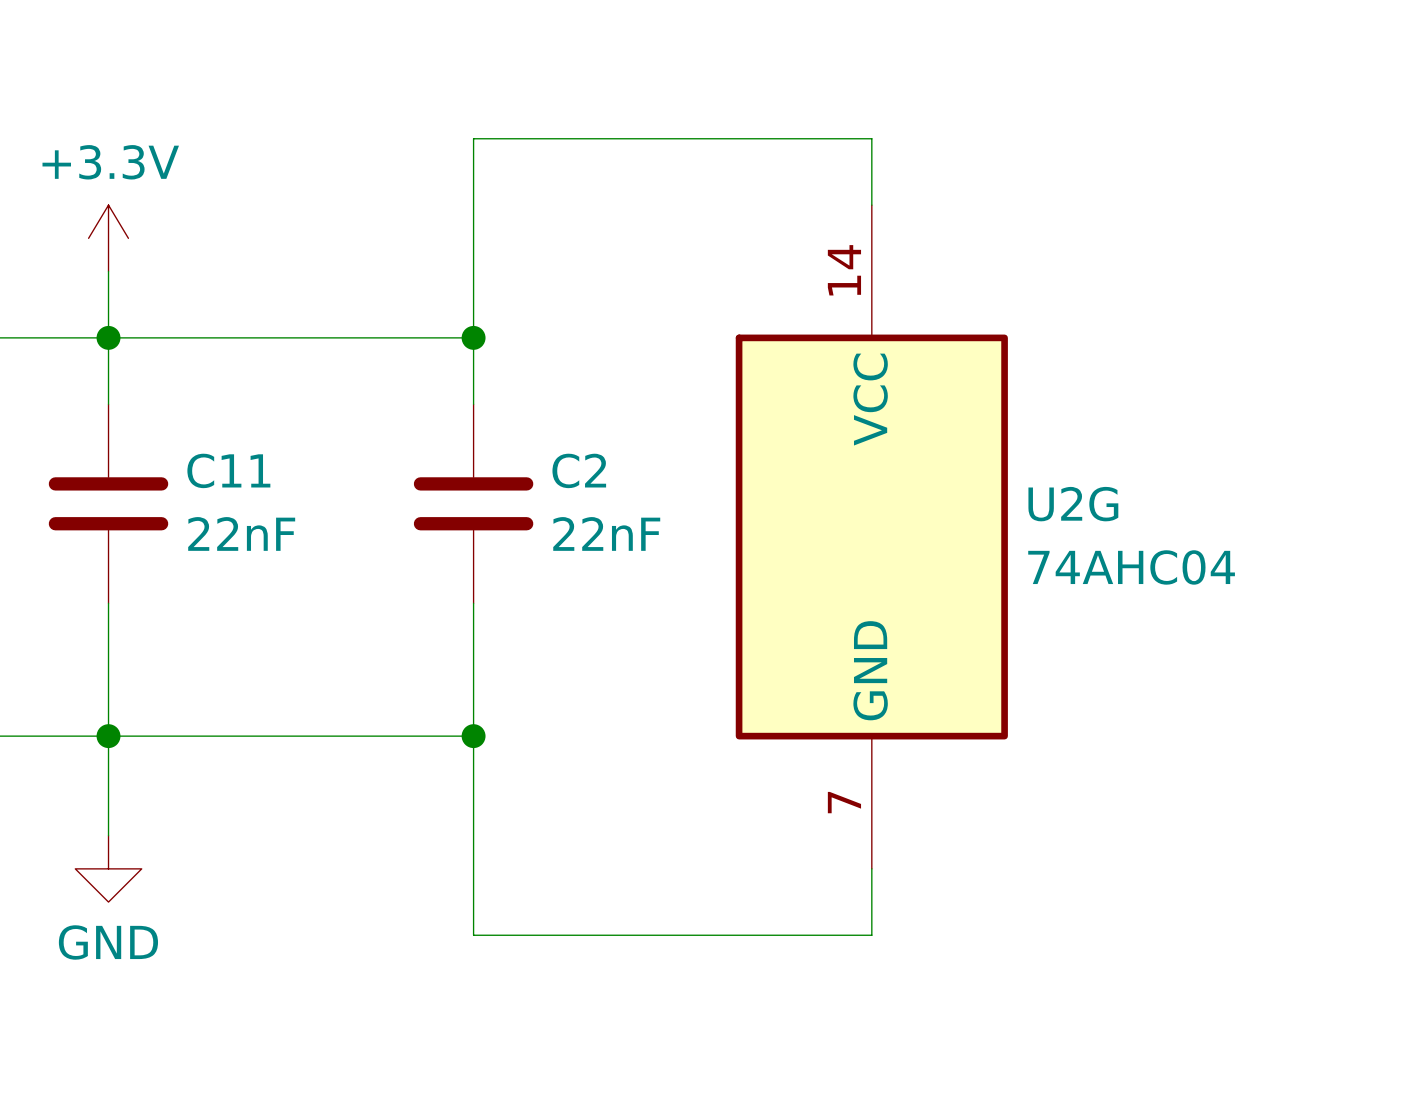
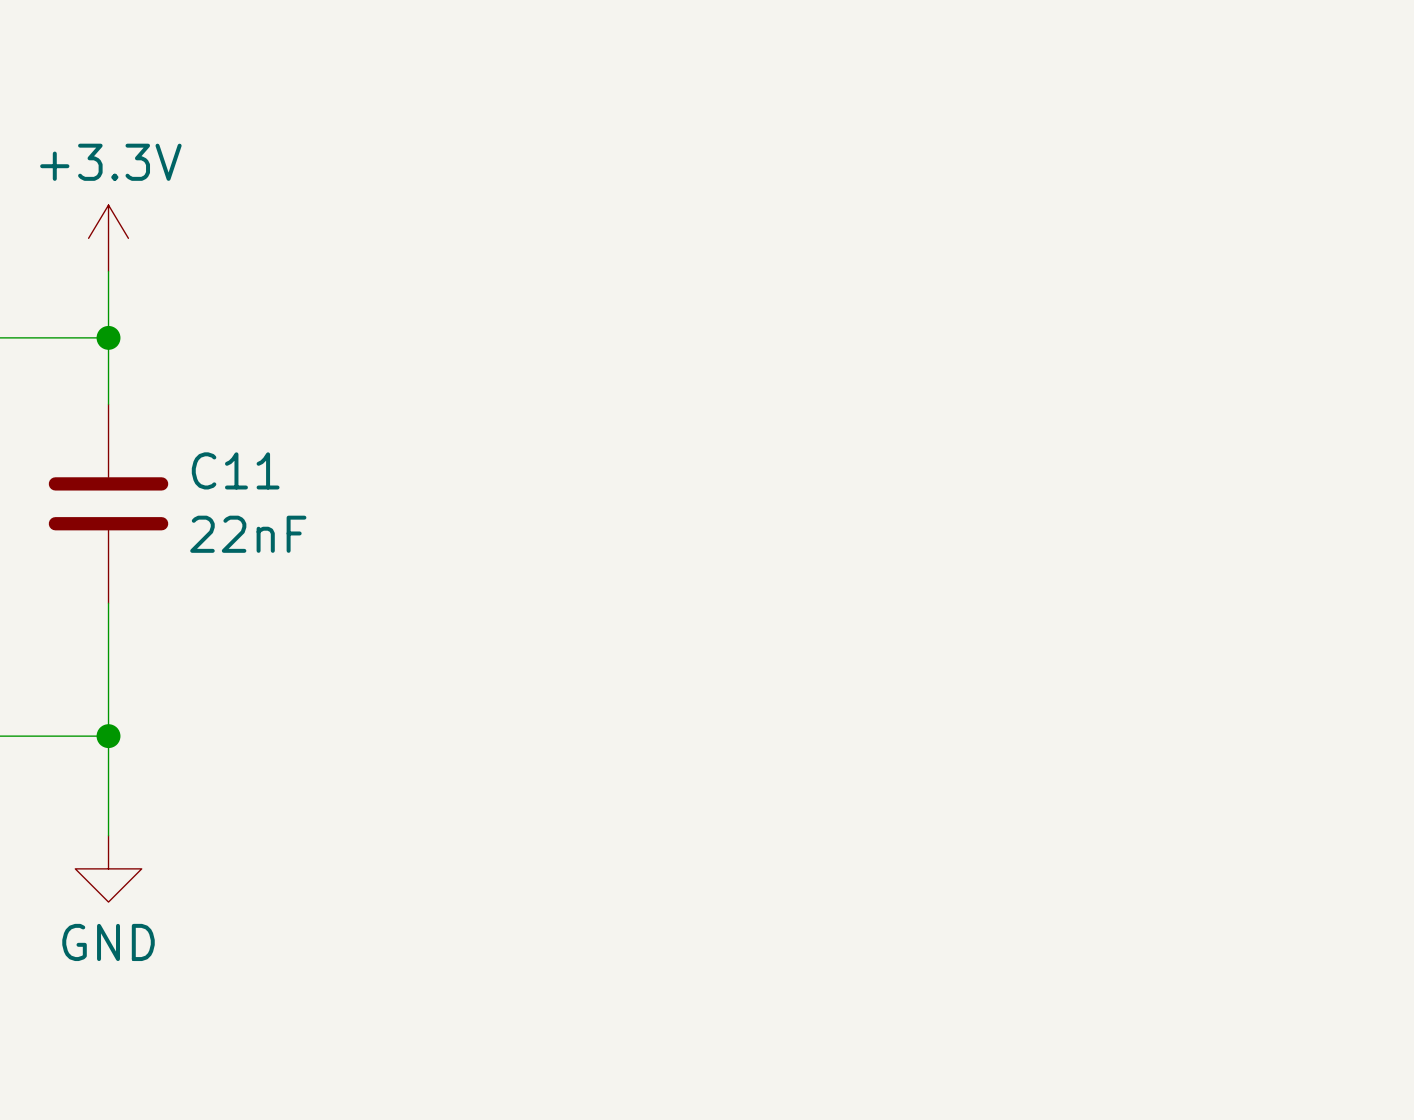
wire: (871, 205) (871, 138) (473, 138) (473, 404) -> none
wire: (108, 337) (473, 337) -> none
junction: (473, 337) -> none
C2: 22nF (473, 503) -> none
U2G: 74AHC04 (871, 537) -> none
wire: (473, 603) (473, 935) (871, 935) (871, 868) -> none
wire: (108, 736) (473, 736) -> none
junction: (473, 736) -> none

